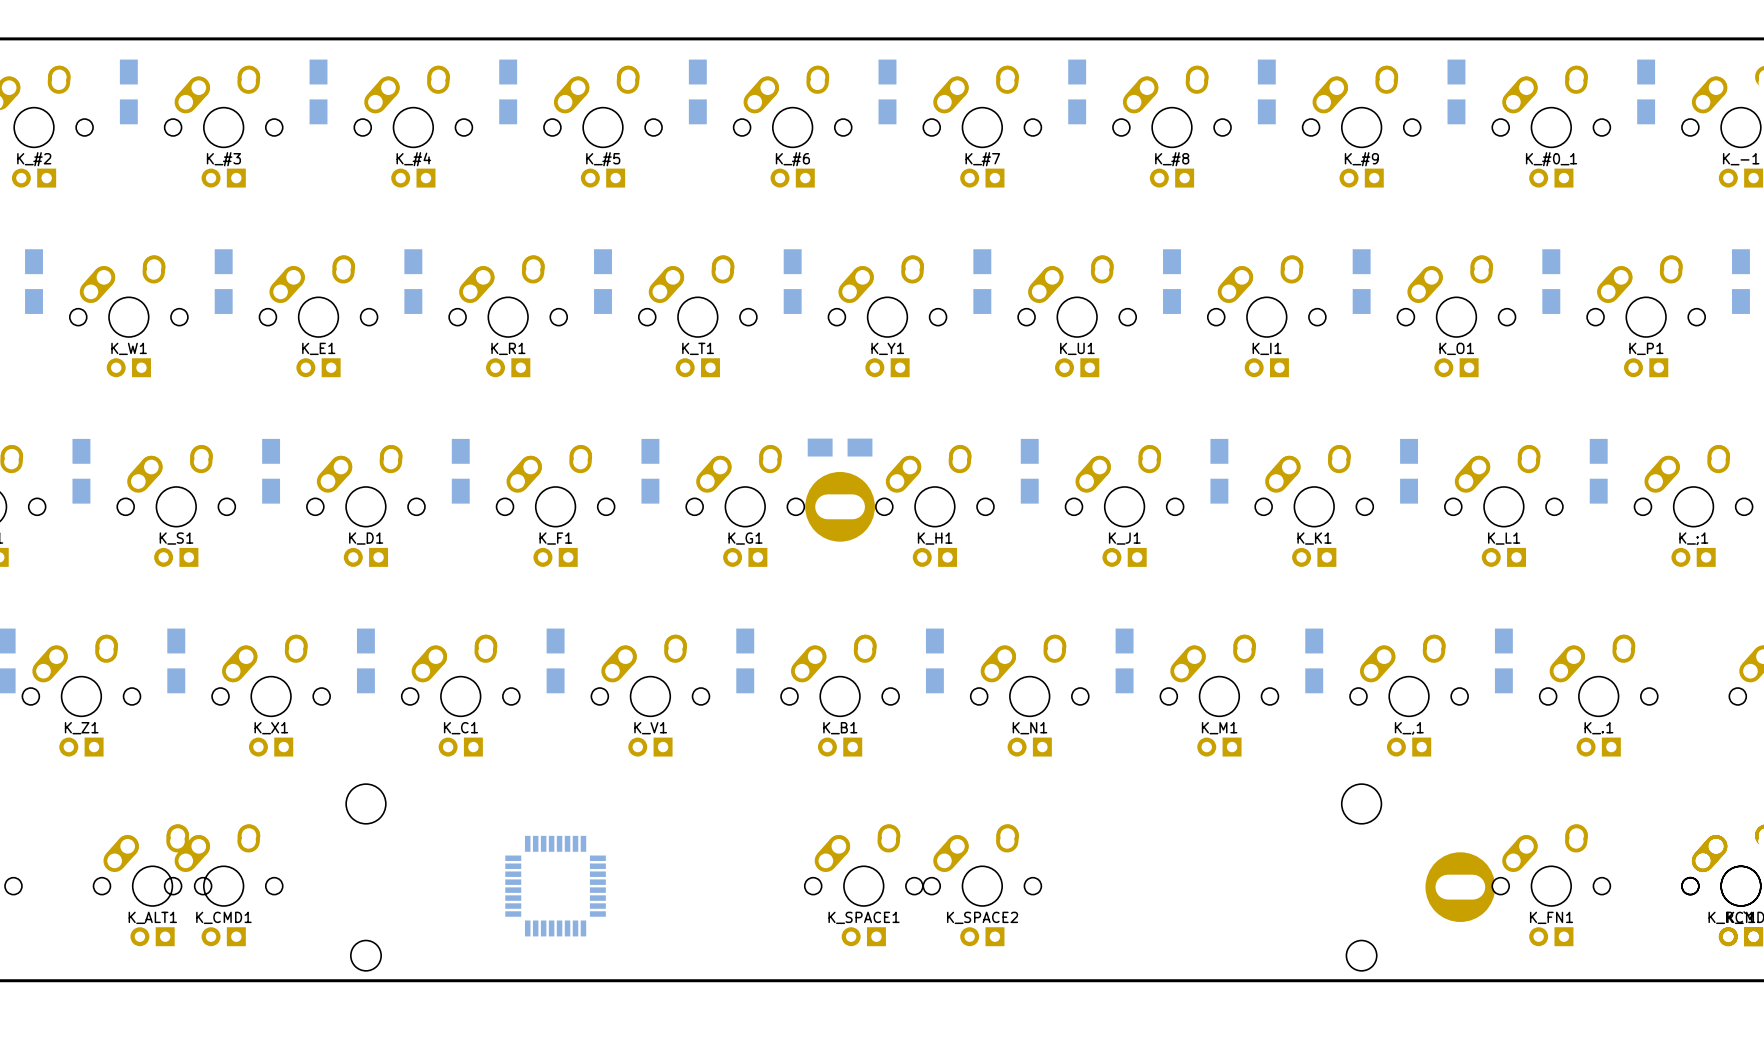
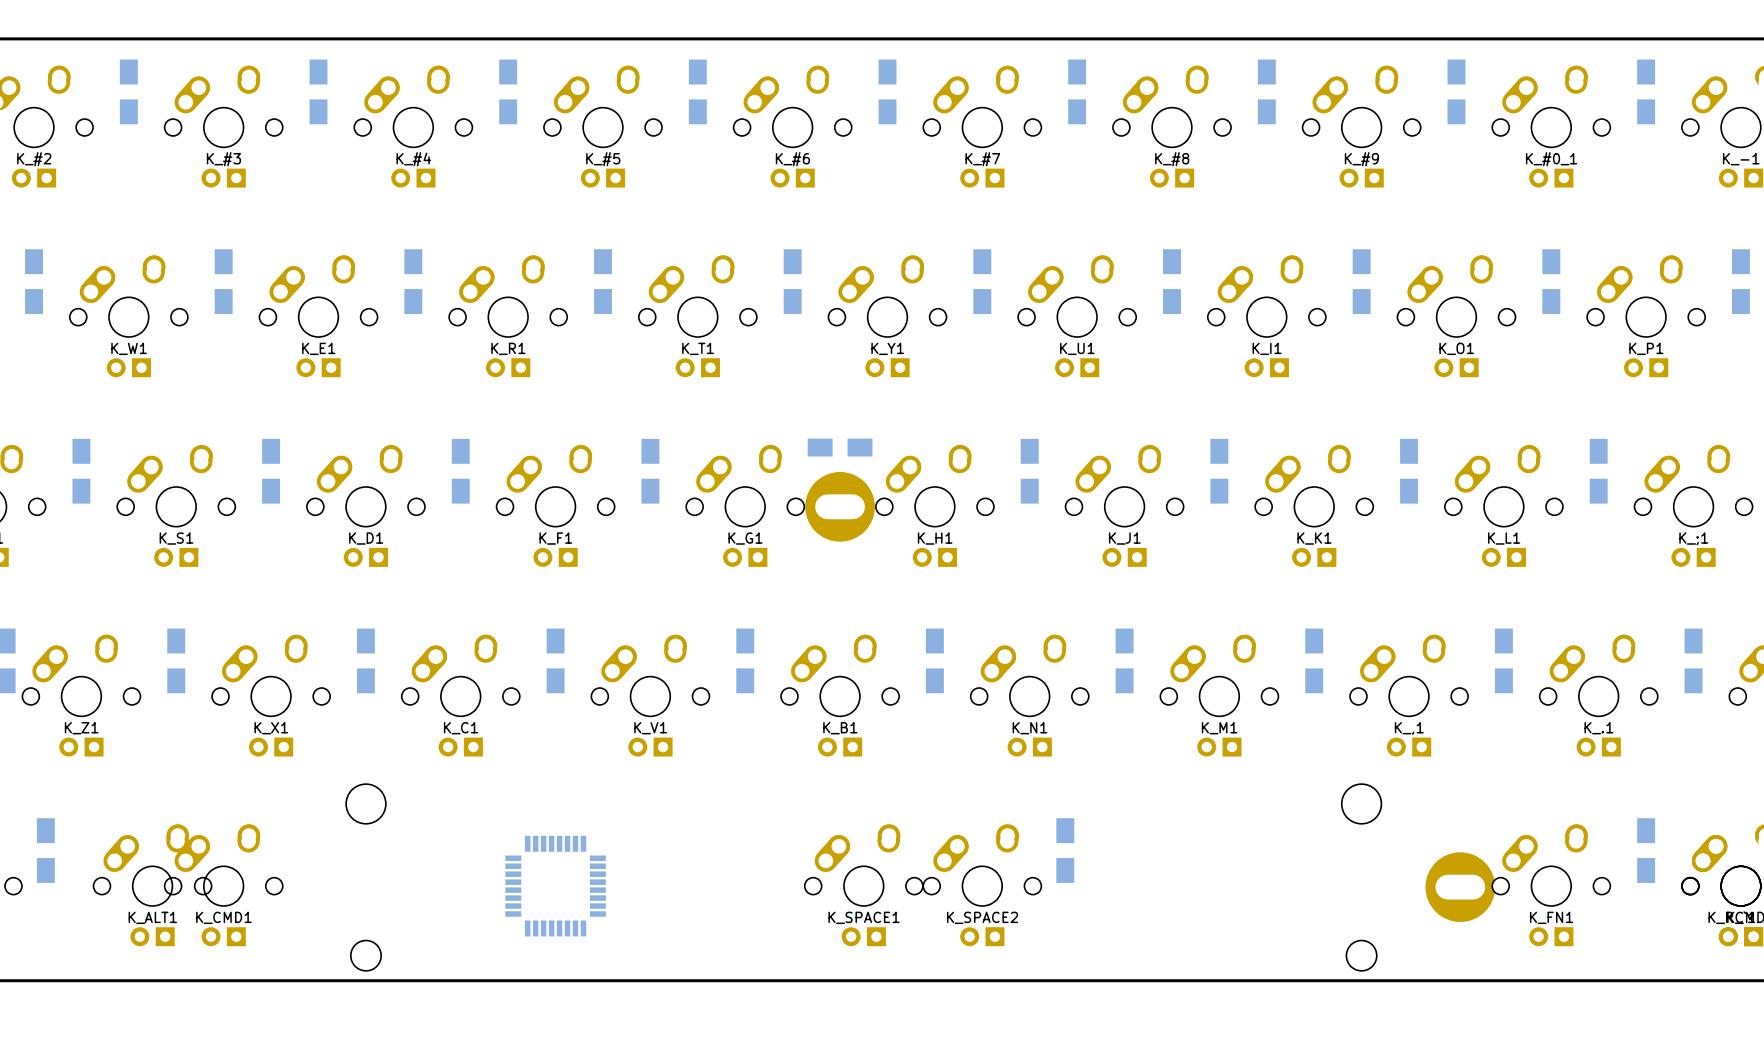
part: none -> (1693, 660)
part: none -> (45, 850)
part: none -> (1065, 850)
part: none -> (1646, 850)

